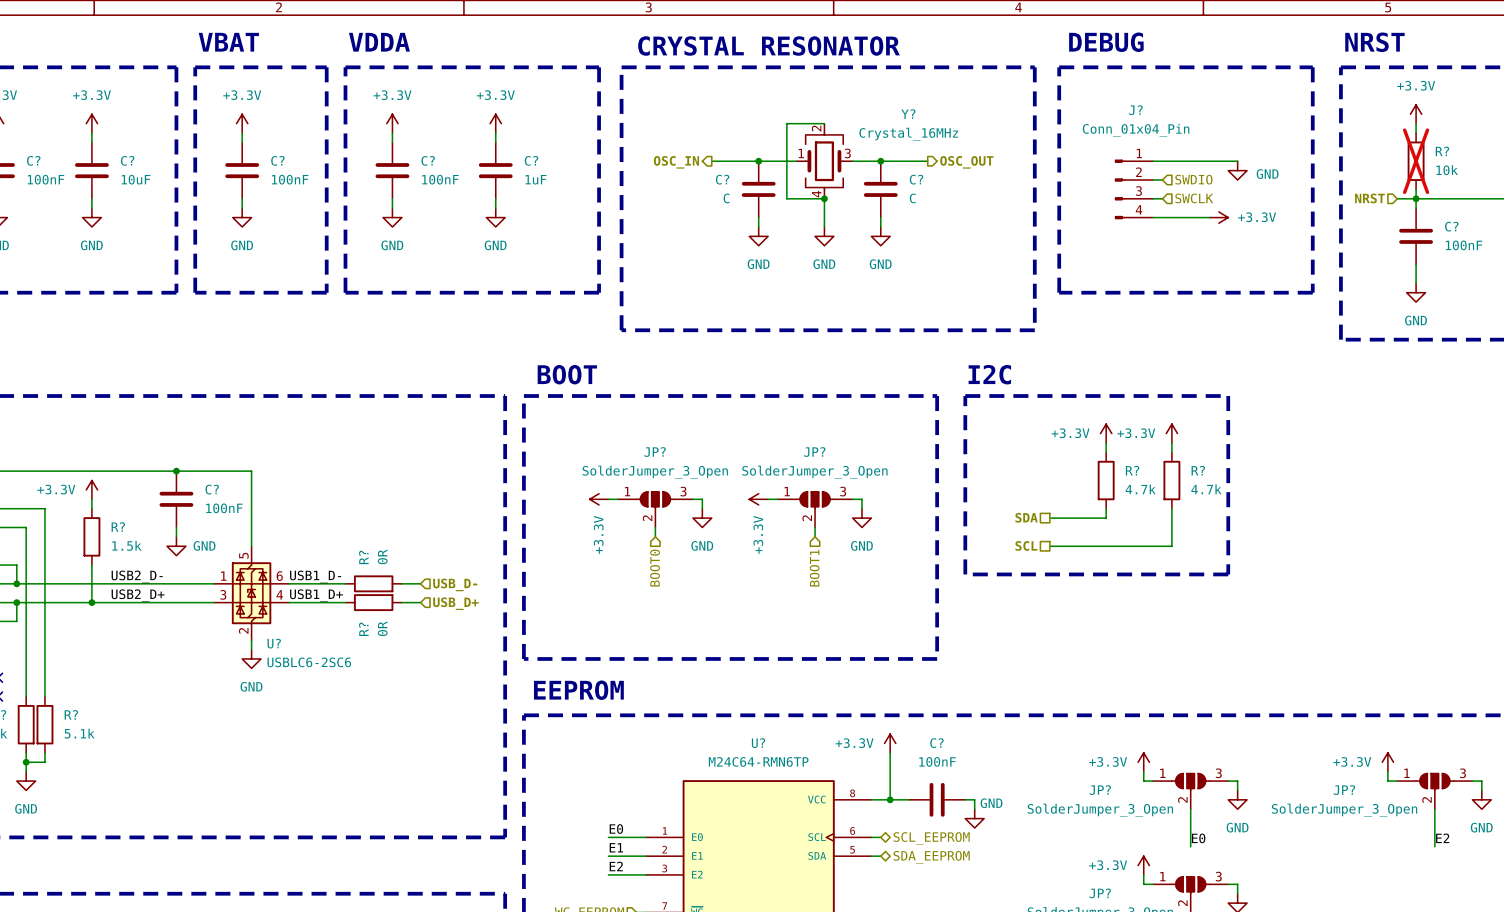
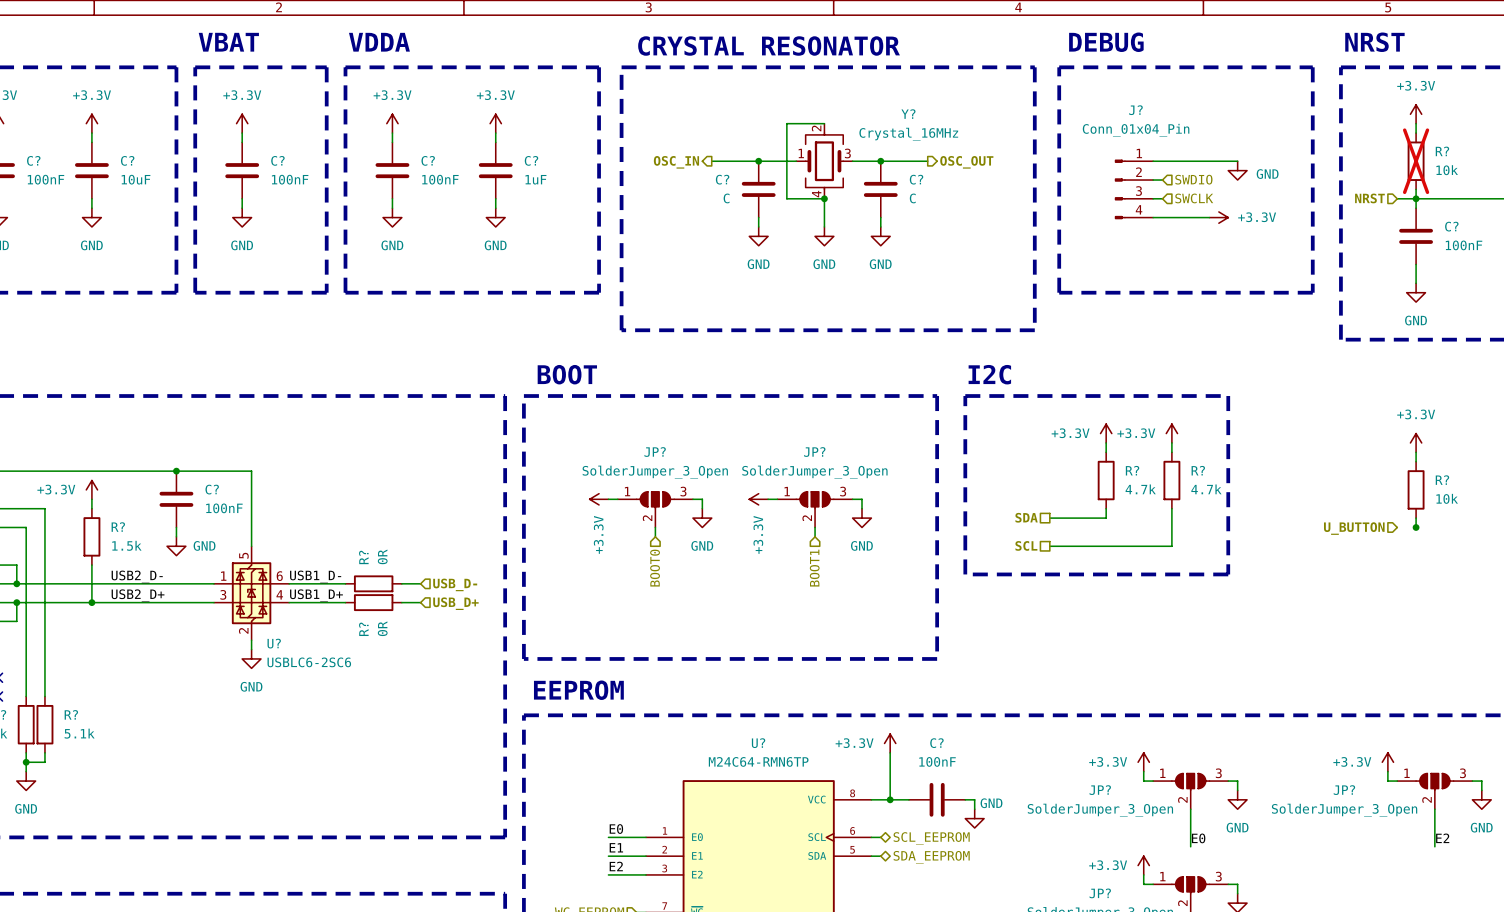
power symbol: none -> +3.3V (1416, 442)
wire: none -> (1416, 452) (1416, 461)
R?: none -> 10k (1416, 489)
wire: none -> (1416, 518) (1416, 527)
junction: none -> (1416, 527)
hierarchical label: none -> U_BUTTON (1354, 528)

